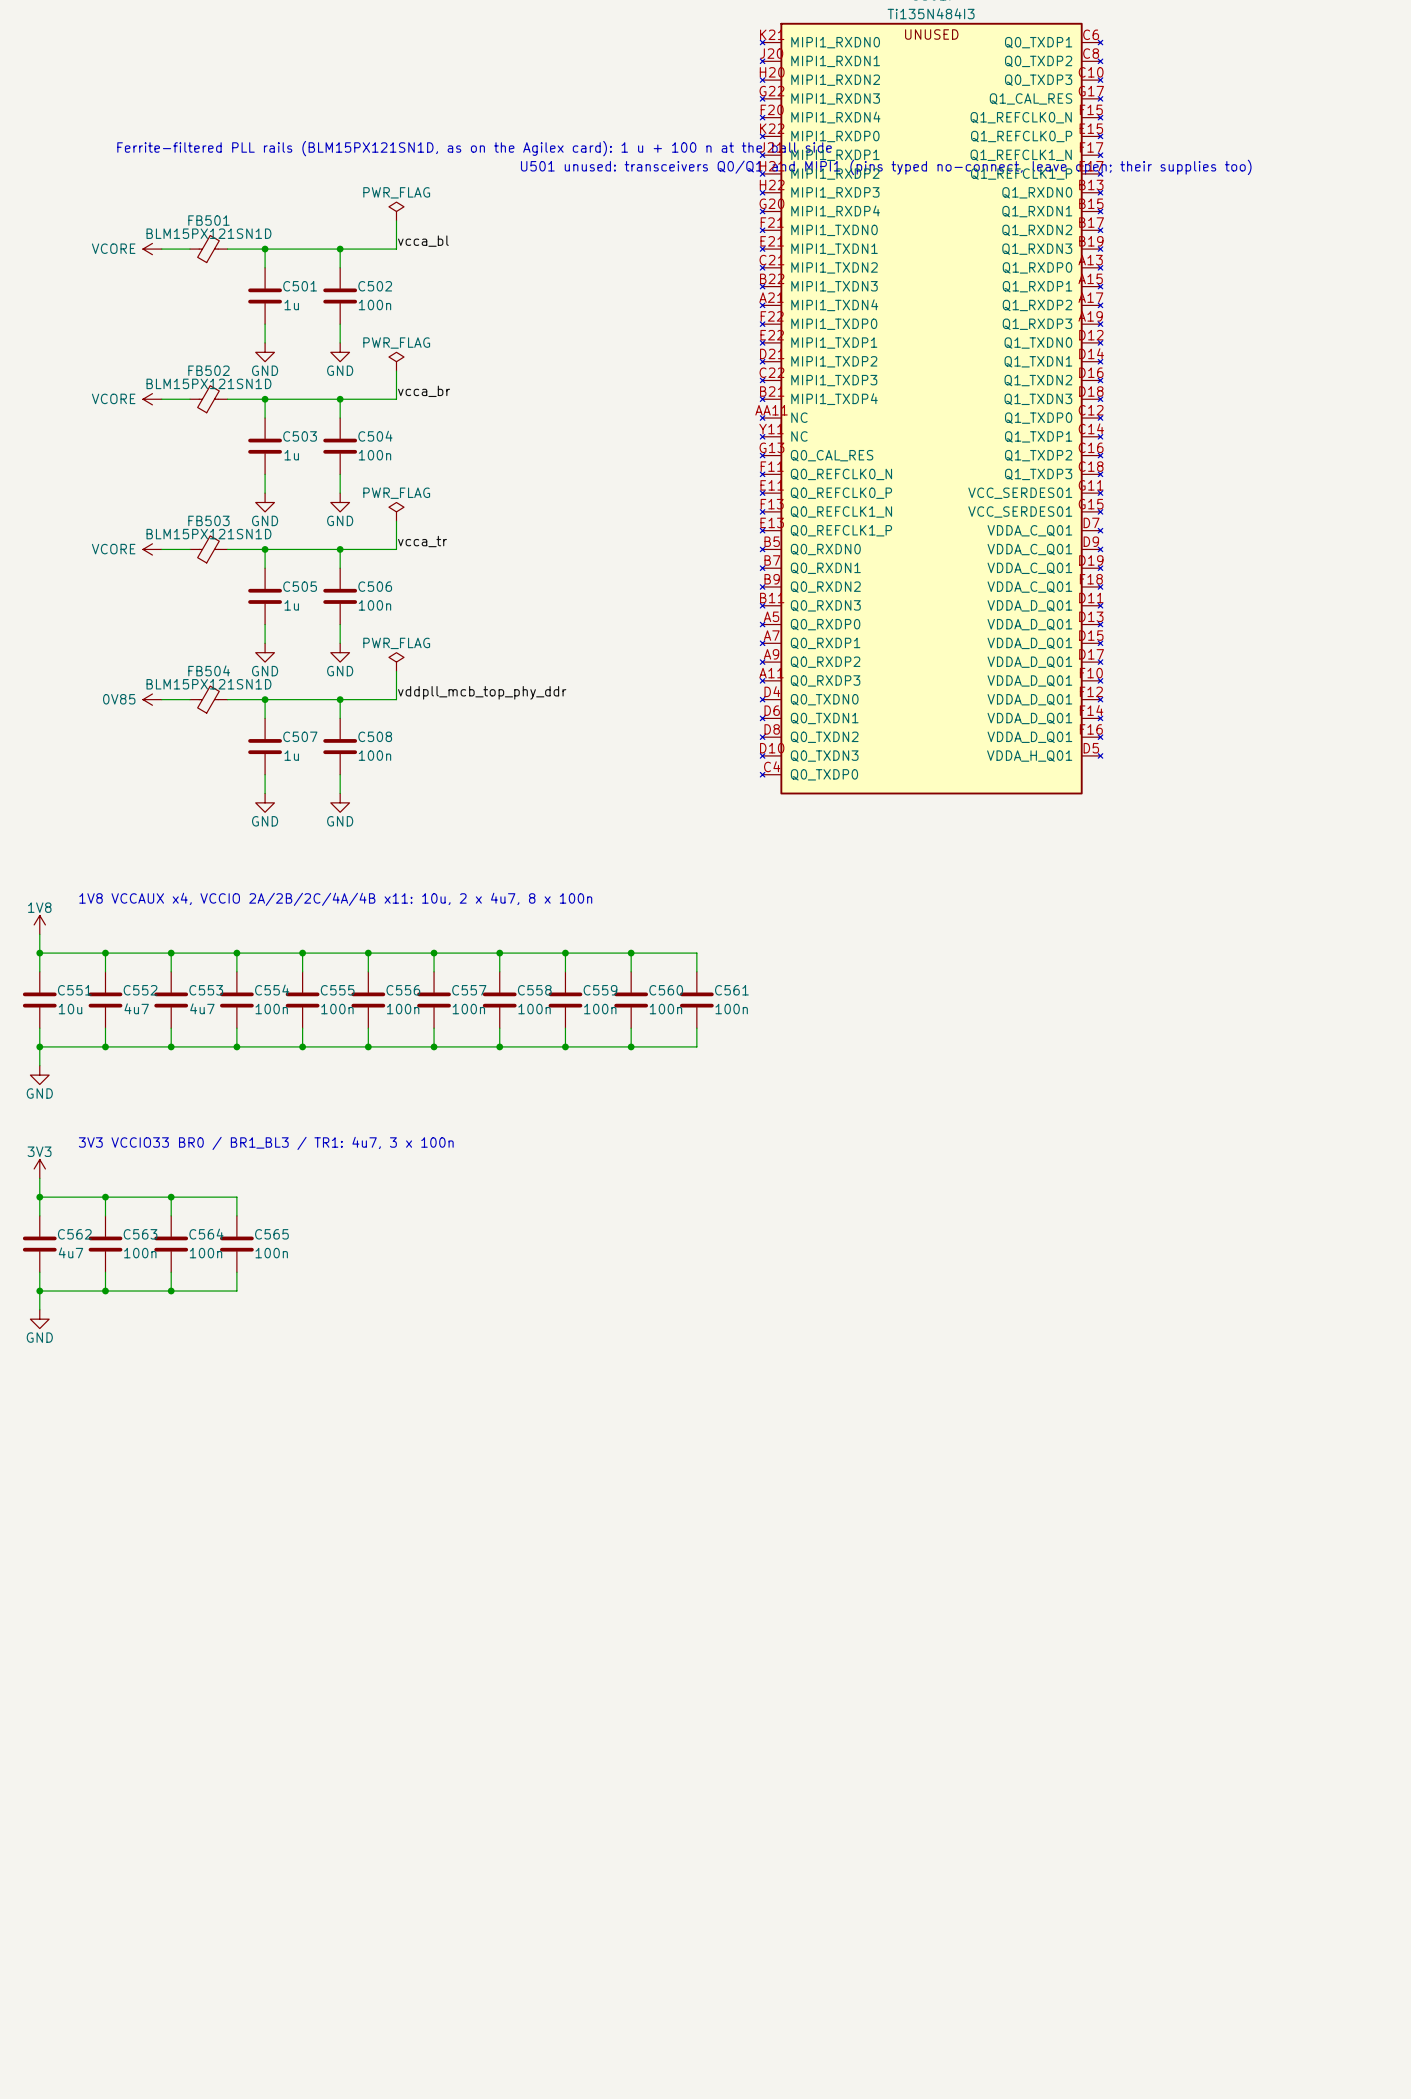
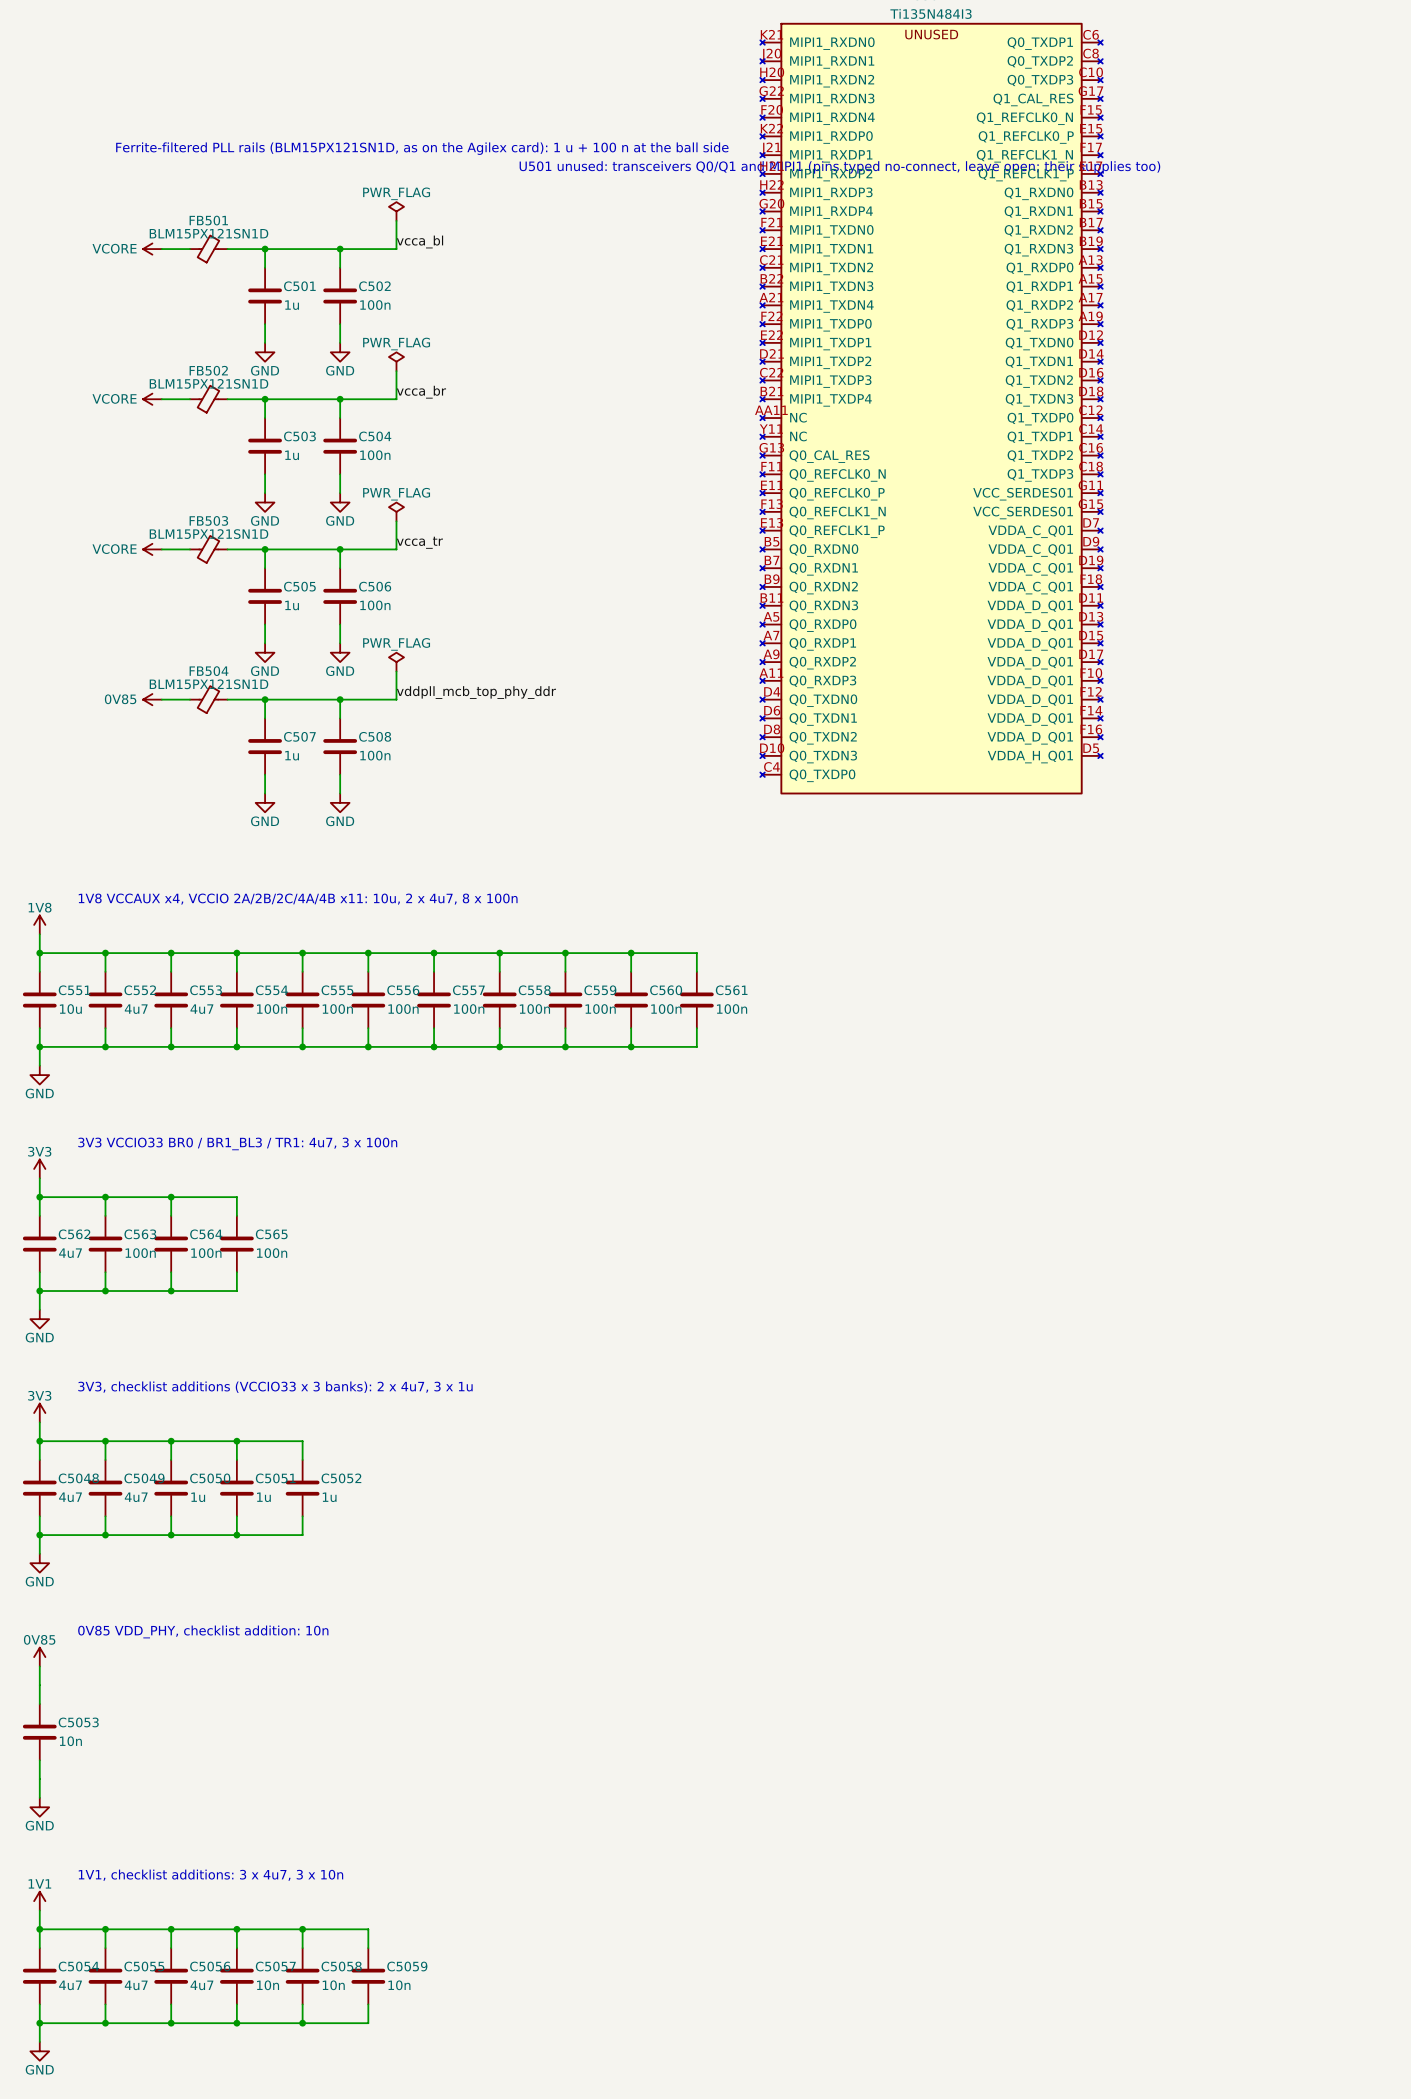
text: none -> 3V3, checklist additions (VCCIO33 x 3 banks): 2 x 4u7, 3 x 1u (275, 1387)
power symbol: none -> 3V3 (39, 1413)
wire: none -> (39, 1422) (39, 1459)
wire: none -> (39, 1441) (302, 1441) (302, 1459)
junction: none -> (39, 1441)
wire: none -> (105, 1441) (105, 1459)
junction: none -> (105, 1441)
wire: none -> (171, 1441) (171, 1459)
junction: none -> (171, 1441)
wire: none -> (236, 1441) (236, 1459)
junction: none -> (236, 1441)
C5048: none -> 4u7 (39, 1488)
C5049: none -> 4u7 (105, 1488)
C5050: none -> 1u (171, 1488)
C5051: none -> 1u (236, 1488)
C5052: none -> 1u (302, 1488)
wire: none -> (39, 1516) (39, 1553)
wire: none -> (105, 1516) (105, 1535)
wire: none -> (171, 1516) (171, 1535)
wire: none -> (236, 1516) (236, 1535)
wire: none -> (302, 1516) (302, 1535) (39, 1535)
junction: none -> (39, 1535)
junction: none -> (105, 1535)
junction: none -> (171, 1535)
junction: none -> (236, 1535)
power symbol: none -> GND (39, 1563)
text: none -> 0V85 VDD_PHY, checklist addition: 10n (203, 1631)
power symbol: none -> 0V85 (39, 1657)
wire: none -> (39, 1666) (39, 1704)
C5053: none -> 10n (39, 1732)
wire: none -> (39, 1760) (39, 1797)
power symbol: none -> GND (39, 1807)
text: none -> 1V1, checklist additions: 3 x 4u7, 3 x 10n (210, 1875)
power symbol: none -> 1V1 (39, 1901)
wire: none -> (39, 1910) (39, 1948)
wire: none -> (39, 1929) (368, 1929) (368, 1948)
junction: none -> (39, 1929)
wire: none -> (105, 1929) (105, 1948)
junction: none -> (105, 1929)
wire: none -> (171, 1929) (171, 1948)
junction: none -> (171, 1929)
wire: none -> (236, 1929) (236, 1948)
junction: none -> (236, 1929)
wire: none -> (302, 1929) (302, 1948)
junction: none -> (302, 1929)
C5054: none -> 4u7 (39, 1976)
C5055: none -> 4u7 (105, 1976)
C5056: none -> 4u7 (171, 1976)
C5057: none -> 10n (236, 1976)
C5058: none -> 10n (302, 1976)
C5059: none -> 10n (368, 1976)
wire: none -> (39, 2004) (39, 2041)
wire: none -> (105, 2004) (105, 2023)
wire: none -> (171, 2004) (171, 2023)
wire: none -> (236, 2004) (236, 2023)
wire: none -> (302, 2004) (302, 2023)
wire: none -> (368, 2004) (368, 2023) (39, 2023)
junction: none -> (39, 2023)
junction: none -> (105, 2023)
junction: none -> (171, 2023)
junction: none -> (236, 2023)
junction: none -> (302, 2023)
power symbol: none -> GND (39, 2051)

